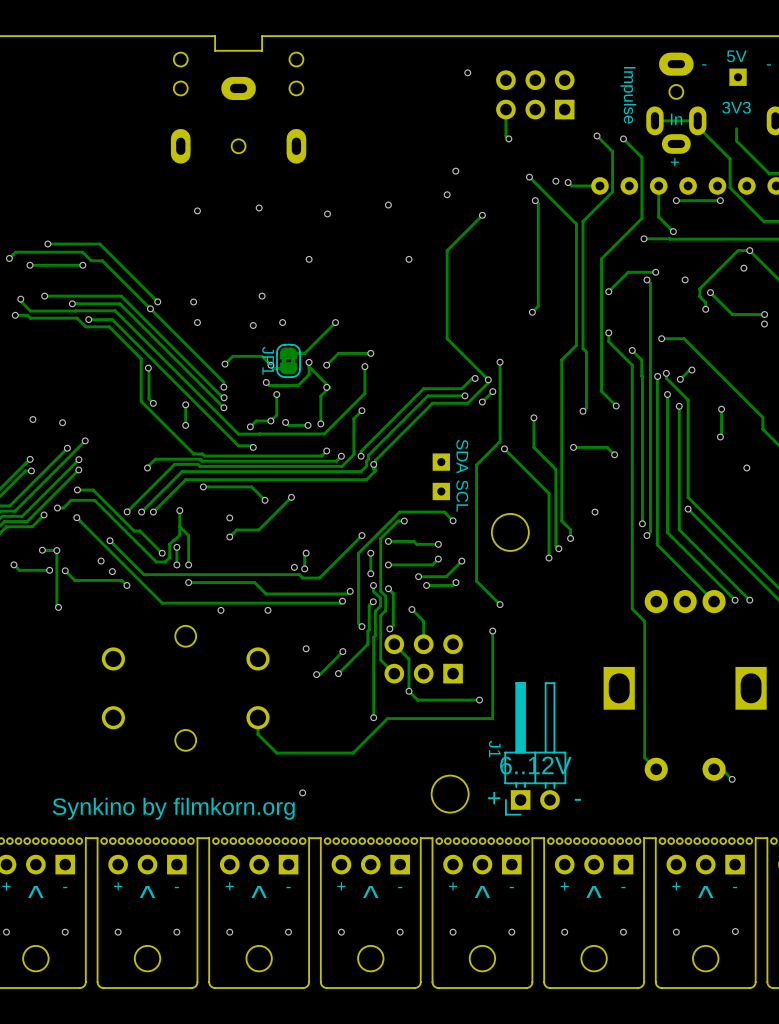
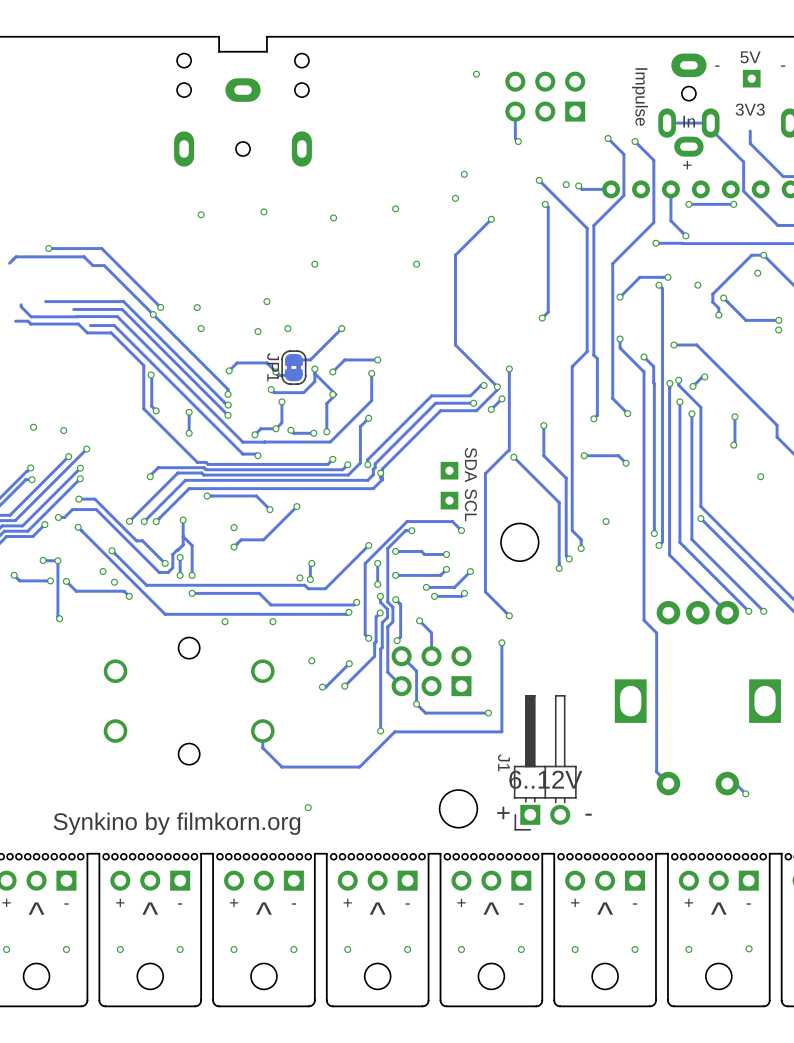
via: (9, 258) -> none
via: (29, 265) -> none
track: (82, 265) (29, 265) -> none
via: (82, 265) -> none
via: (44, 296) -> none
via: (20, 299) -> none
via: (72, 303) -> none
via: (15, 315) -> none
via: (88, 319) -> none

